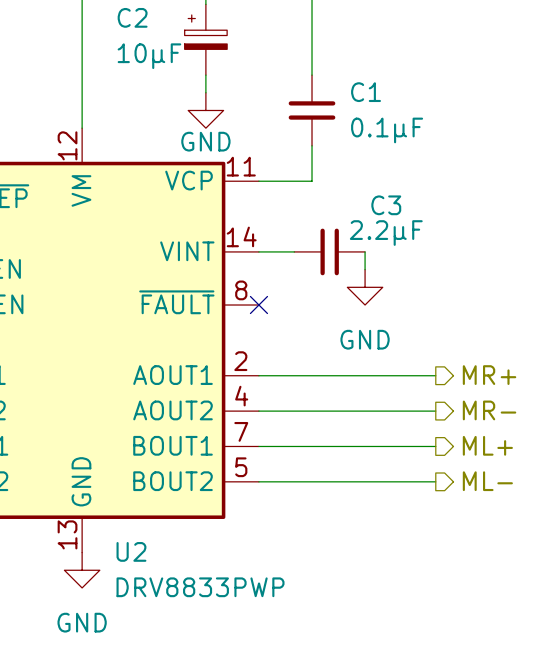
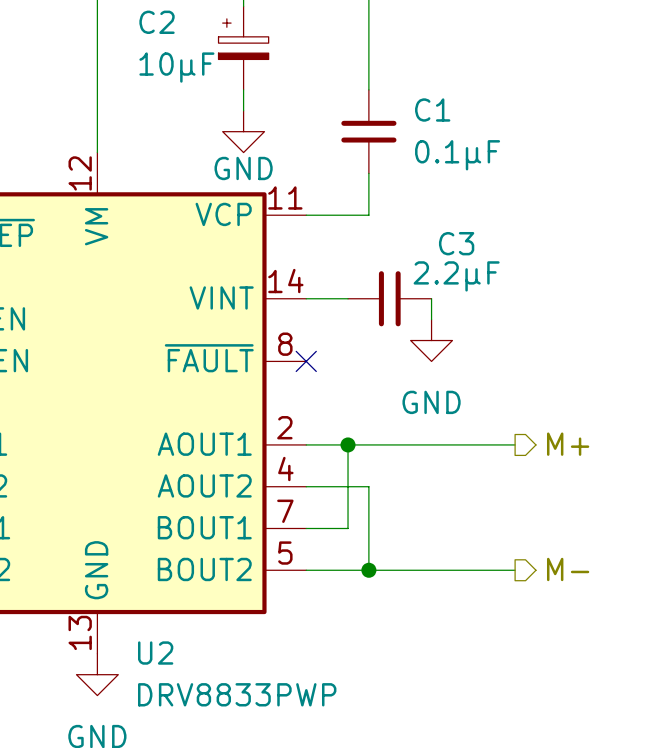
junction: none -> (348, 444)
hierarchical label: MR+ (489, 375) -> M+ (568, 444)
hierarchical label: MR- (489, 410) -> none
wire: (312, 411) (435, 411) -> (368, 486) (368, 570)
hierarchical label: ML+ (487, 445) -> none
wire: (294, 446) (435, 446) -> (348, 528) (348, 444)
junction: none -> (368, 570)
hierarchical label: ML- (487, 481) -> M- (568, 569)

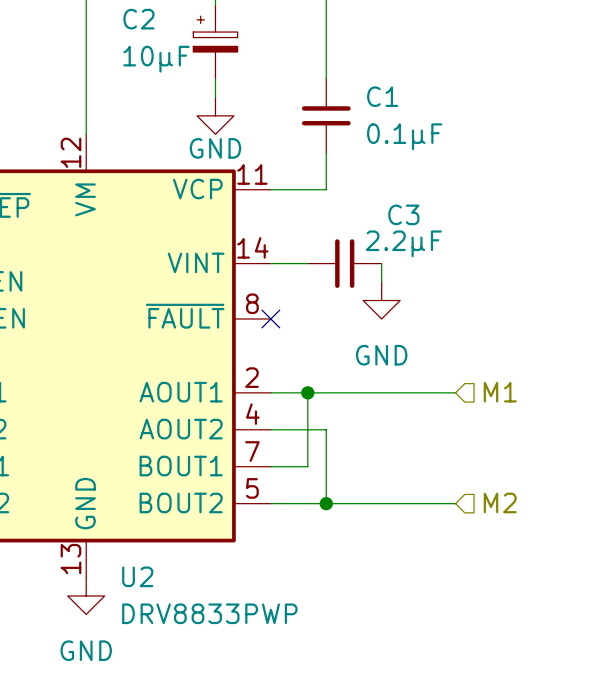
hierarchical label shape: output (568, 444) -> input (500, 392)
hierarchical label: M+ (568, 444) -> M1 (500, 392)
hierarchical label shape: output (568, 569) -> input (500, 502)
hierarchical label: M- (568, 569) -> M2 (500, 502)

